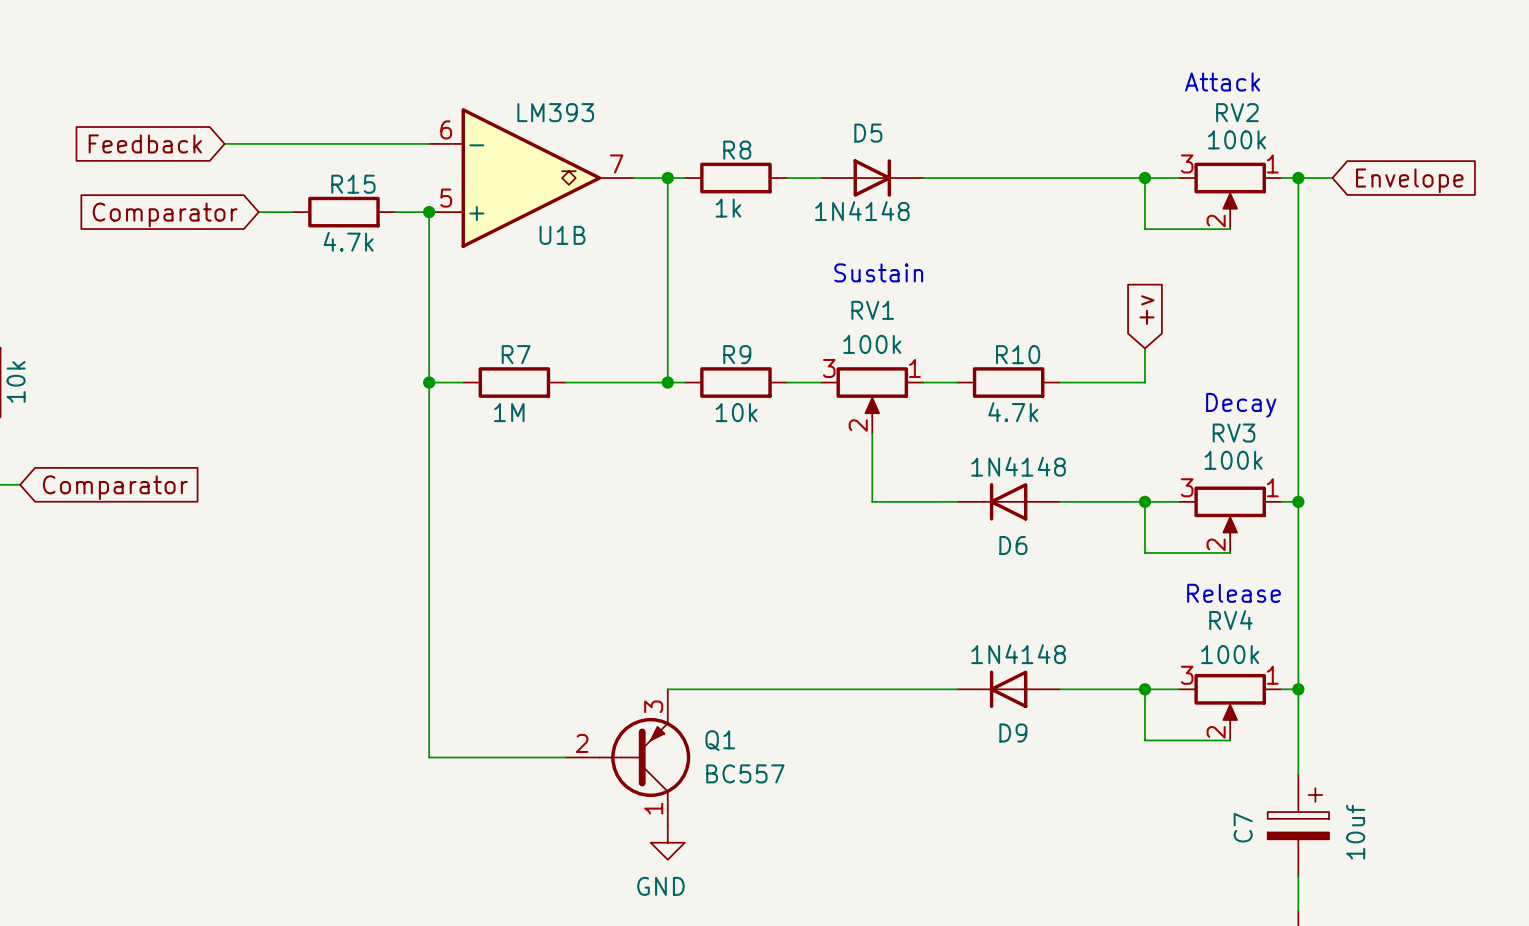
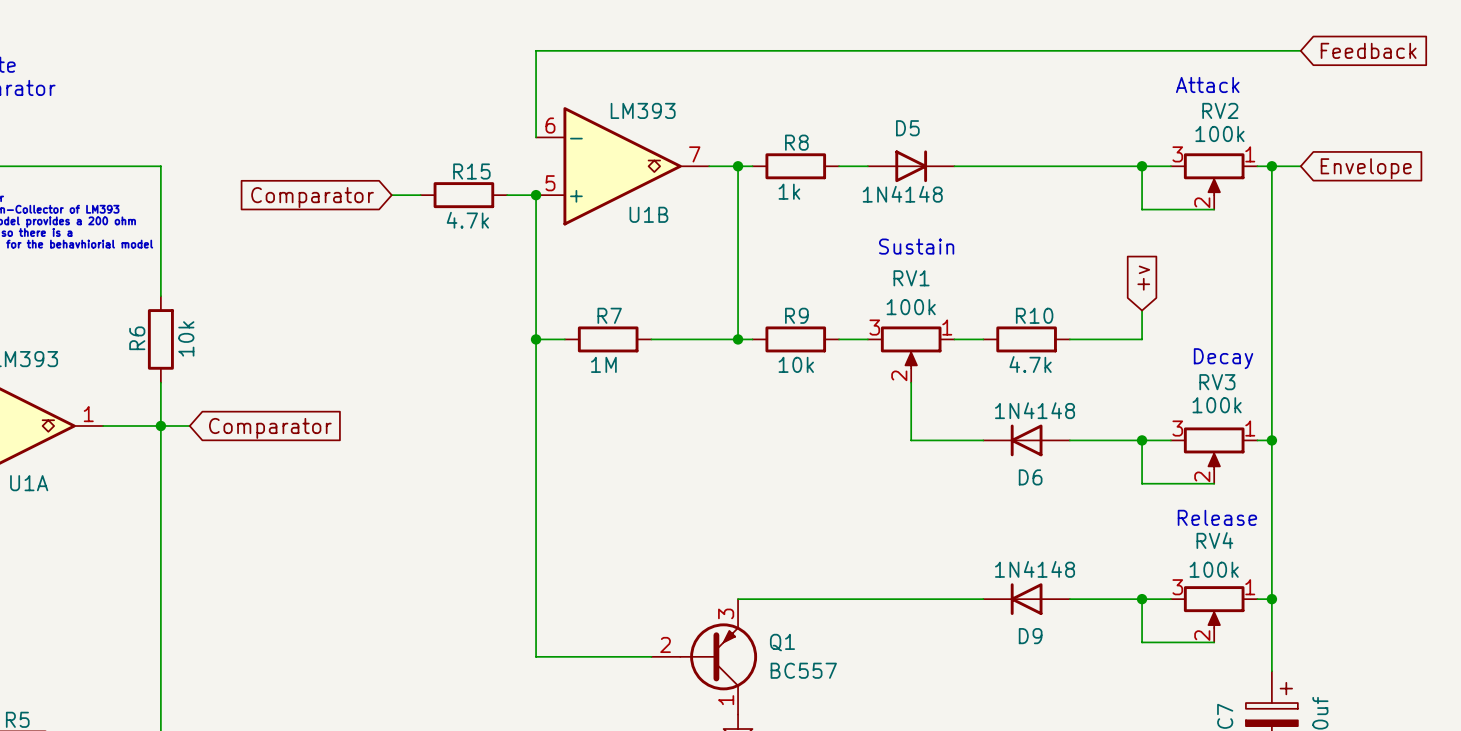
global label: none -> Feedback (1368, 50)
global label: Feedback (145, 143) -> none
wire: (224, 143) (429, 143) -> (1300, 50) (536, 50) (536, 137)

